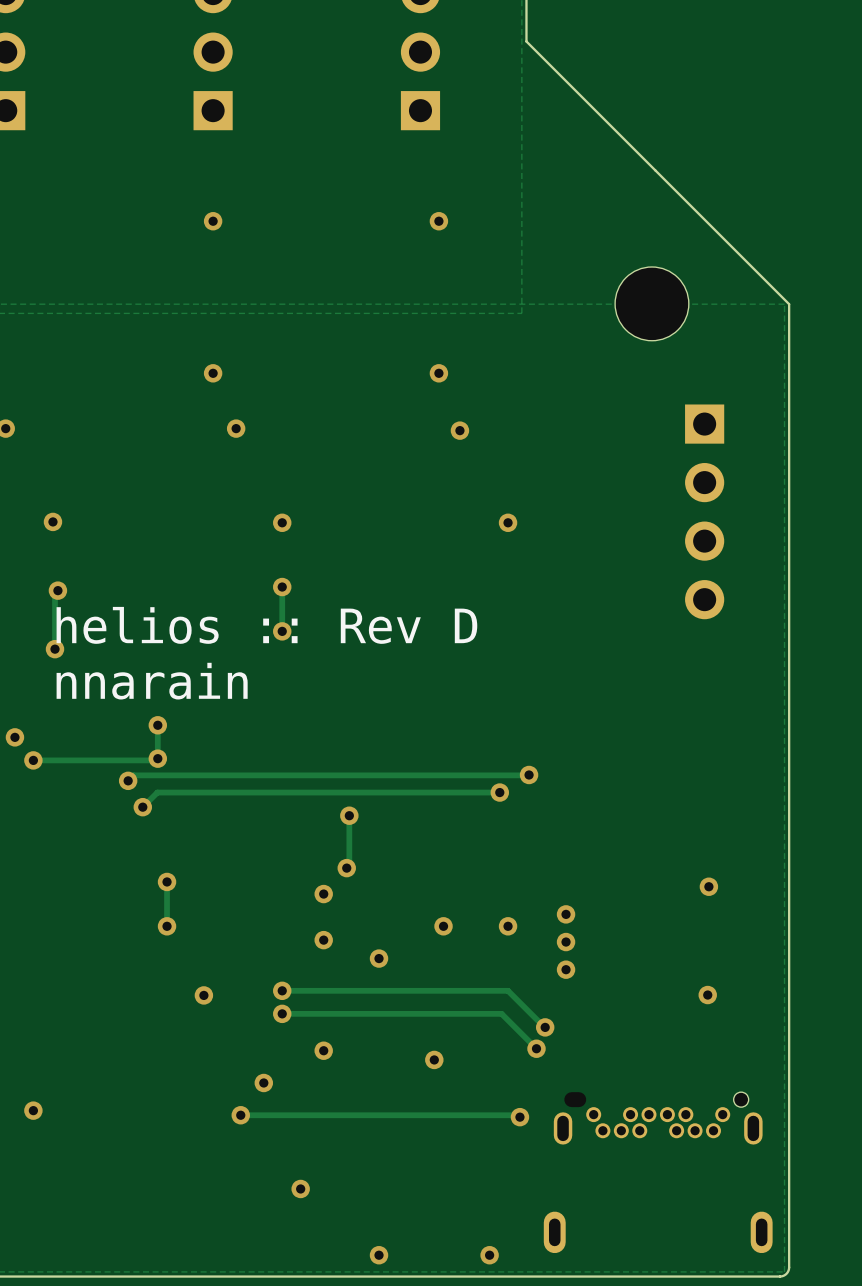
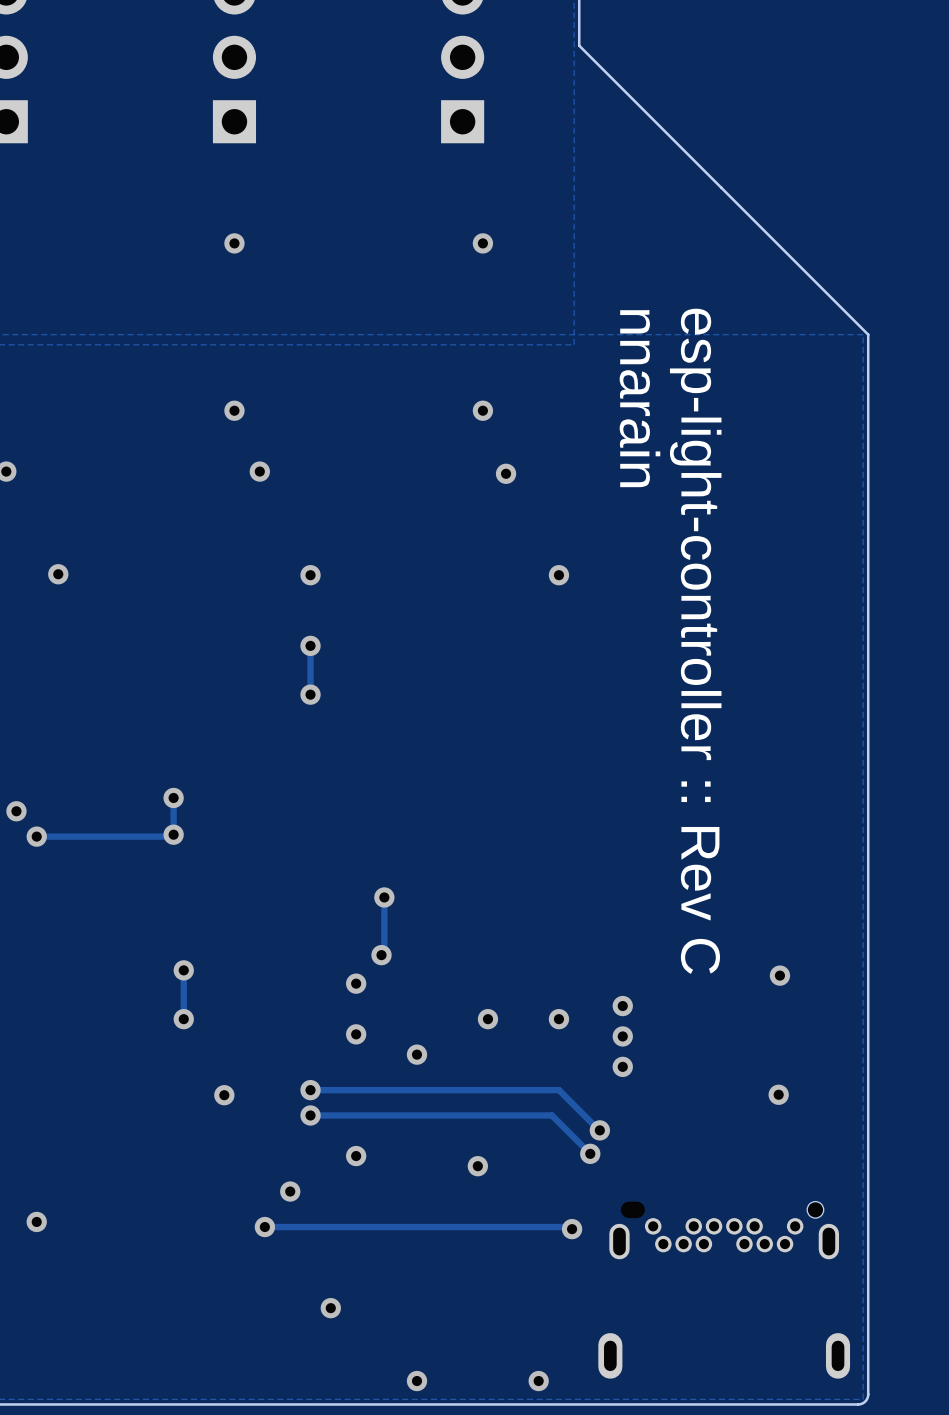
part: (651, 303) -> none
text: none -> nnarain (639, 398)
part: (704, 511) -> none
track: (57, 590) (55, 593) (55, 649) -> none
via: (57, 590) -> none
text: helios :: Rev D (266, 625) -> none
via: (55, 649) -> none
text: nnarain (152, 681) -> none
text: none -> esp-light-controller :: Rev C (695, 641)
track: (529, 774) (133, 775) (128, 780) -> none
via: (529, 774) -> none
via: (128, 780) -> none
track: (499, 792) (157, 792) (142, 807) -> none
via: (499, 792) -> none
via: (142, 807) -> none

